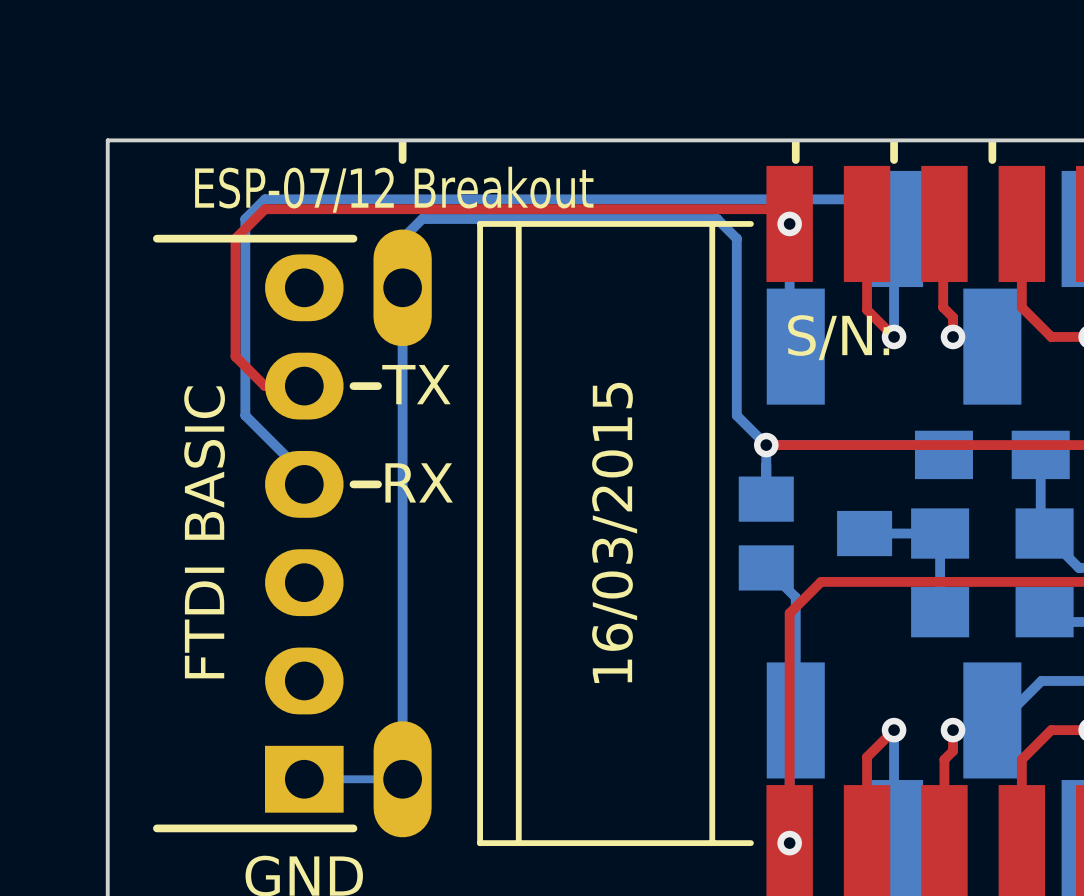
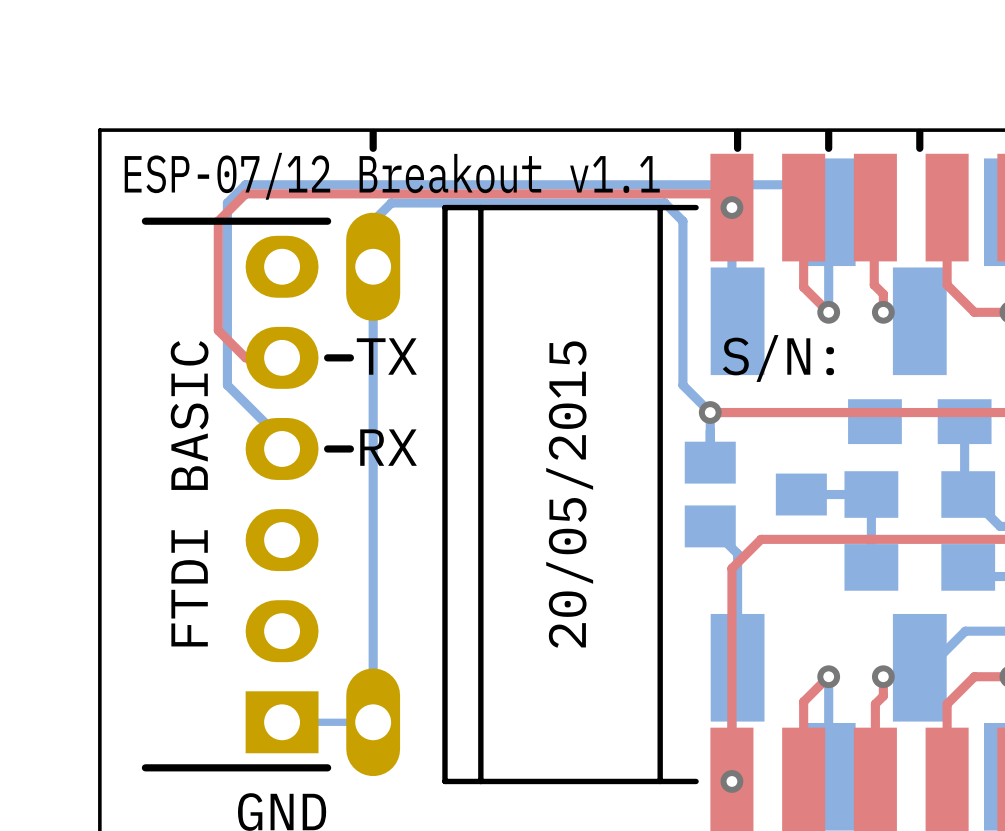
text: ESP-07/12 Breakout (394, 189) -> ESP-07/12 Breakout v1.1 (392, 176)
text position: S/N: (838, 337) -> S/N: (778, 358)
text: 16/03/2015 (614, 532) -> 20/05/2015 (569, 494)

